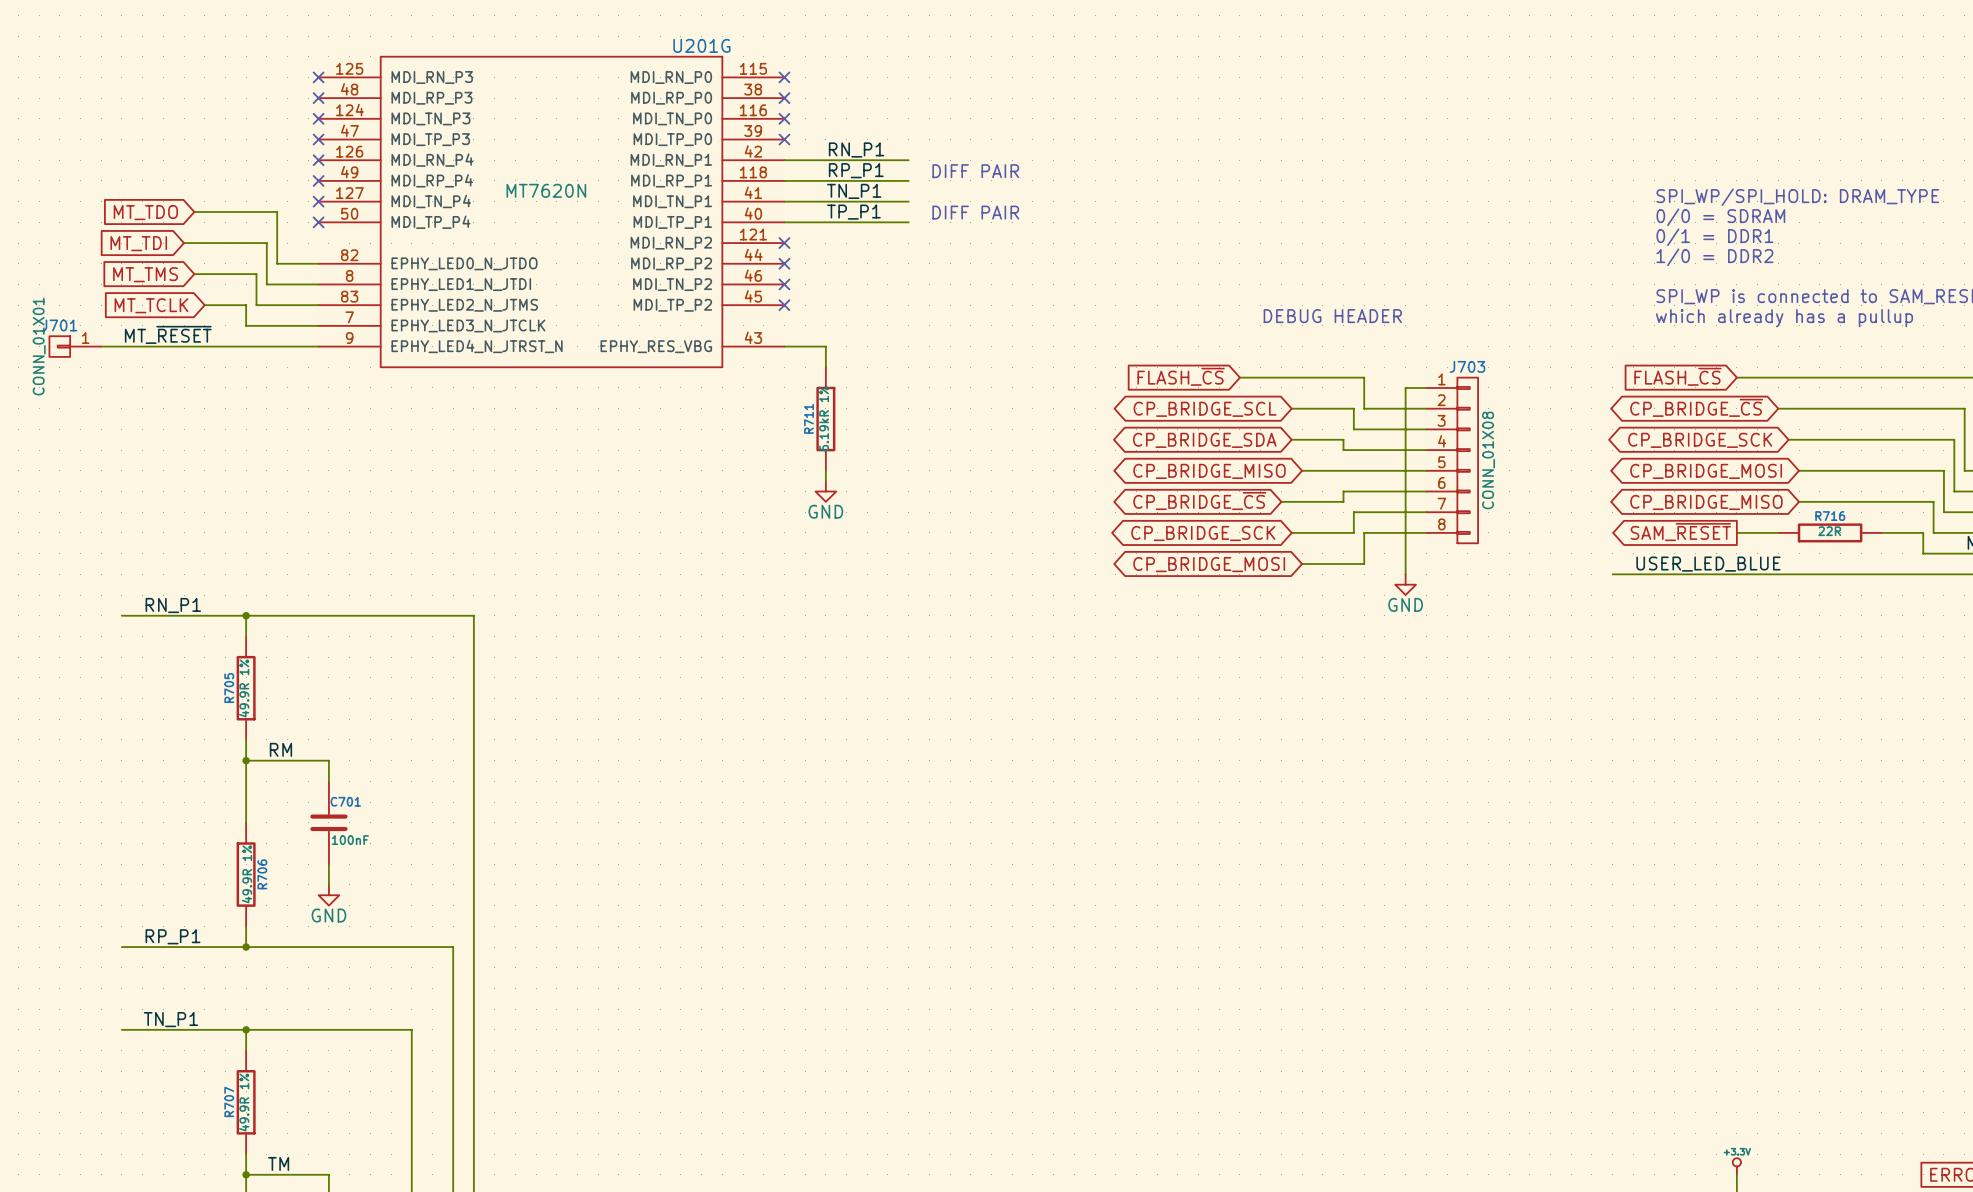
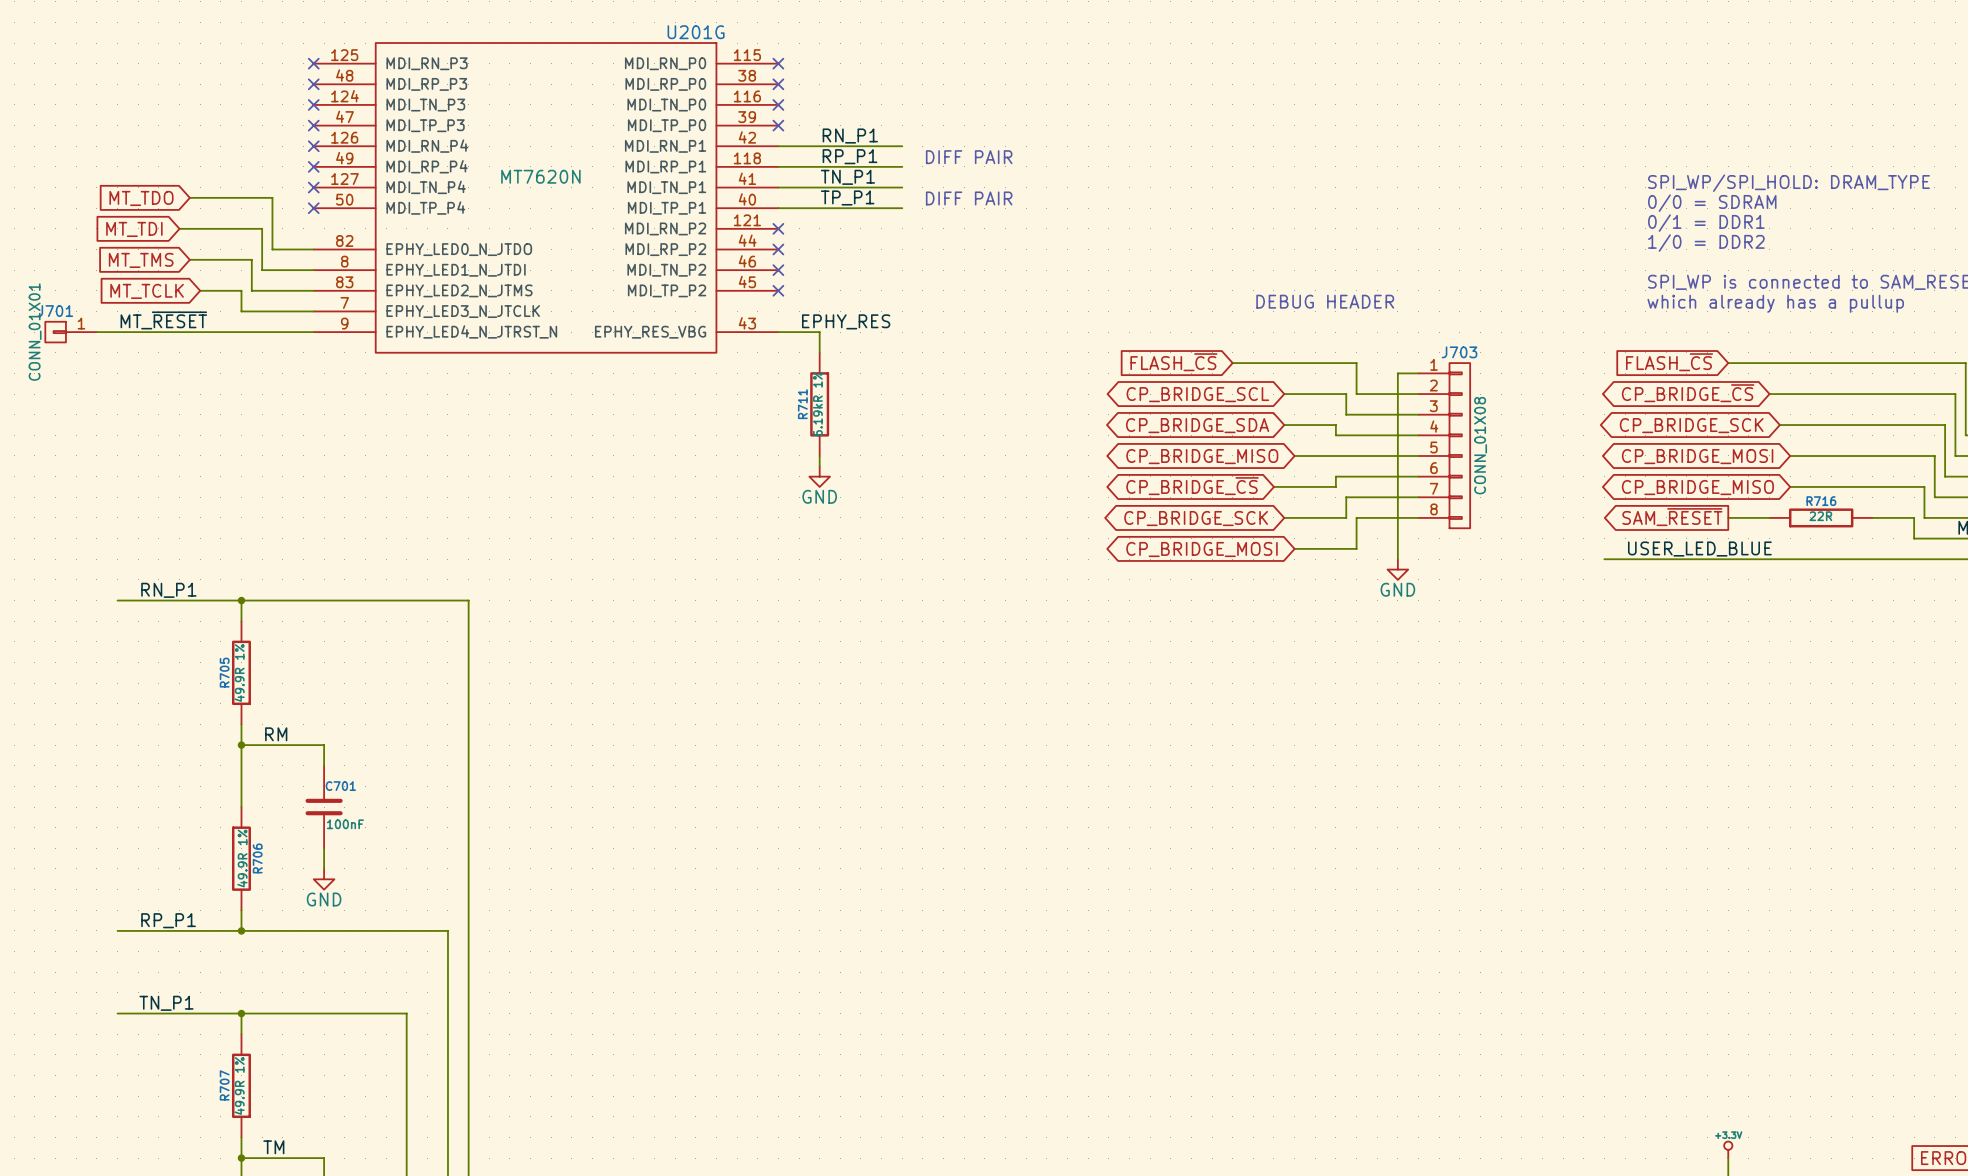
label: none -> EPHY_RES (846, 321)

